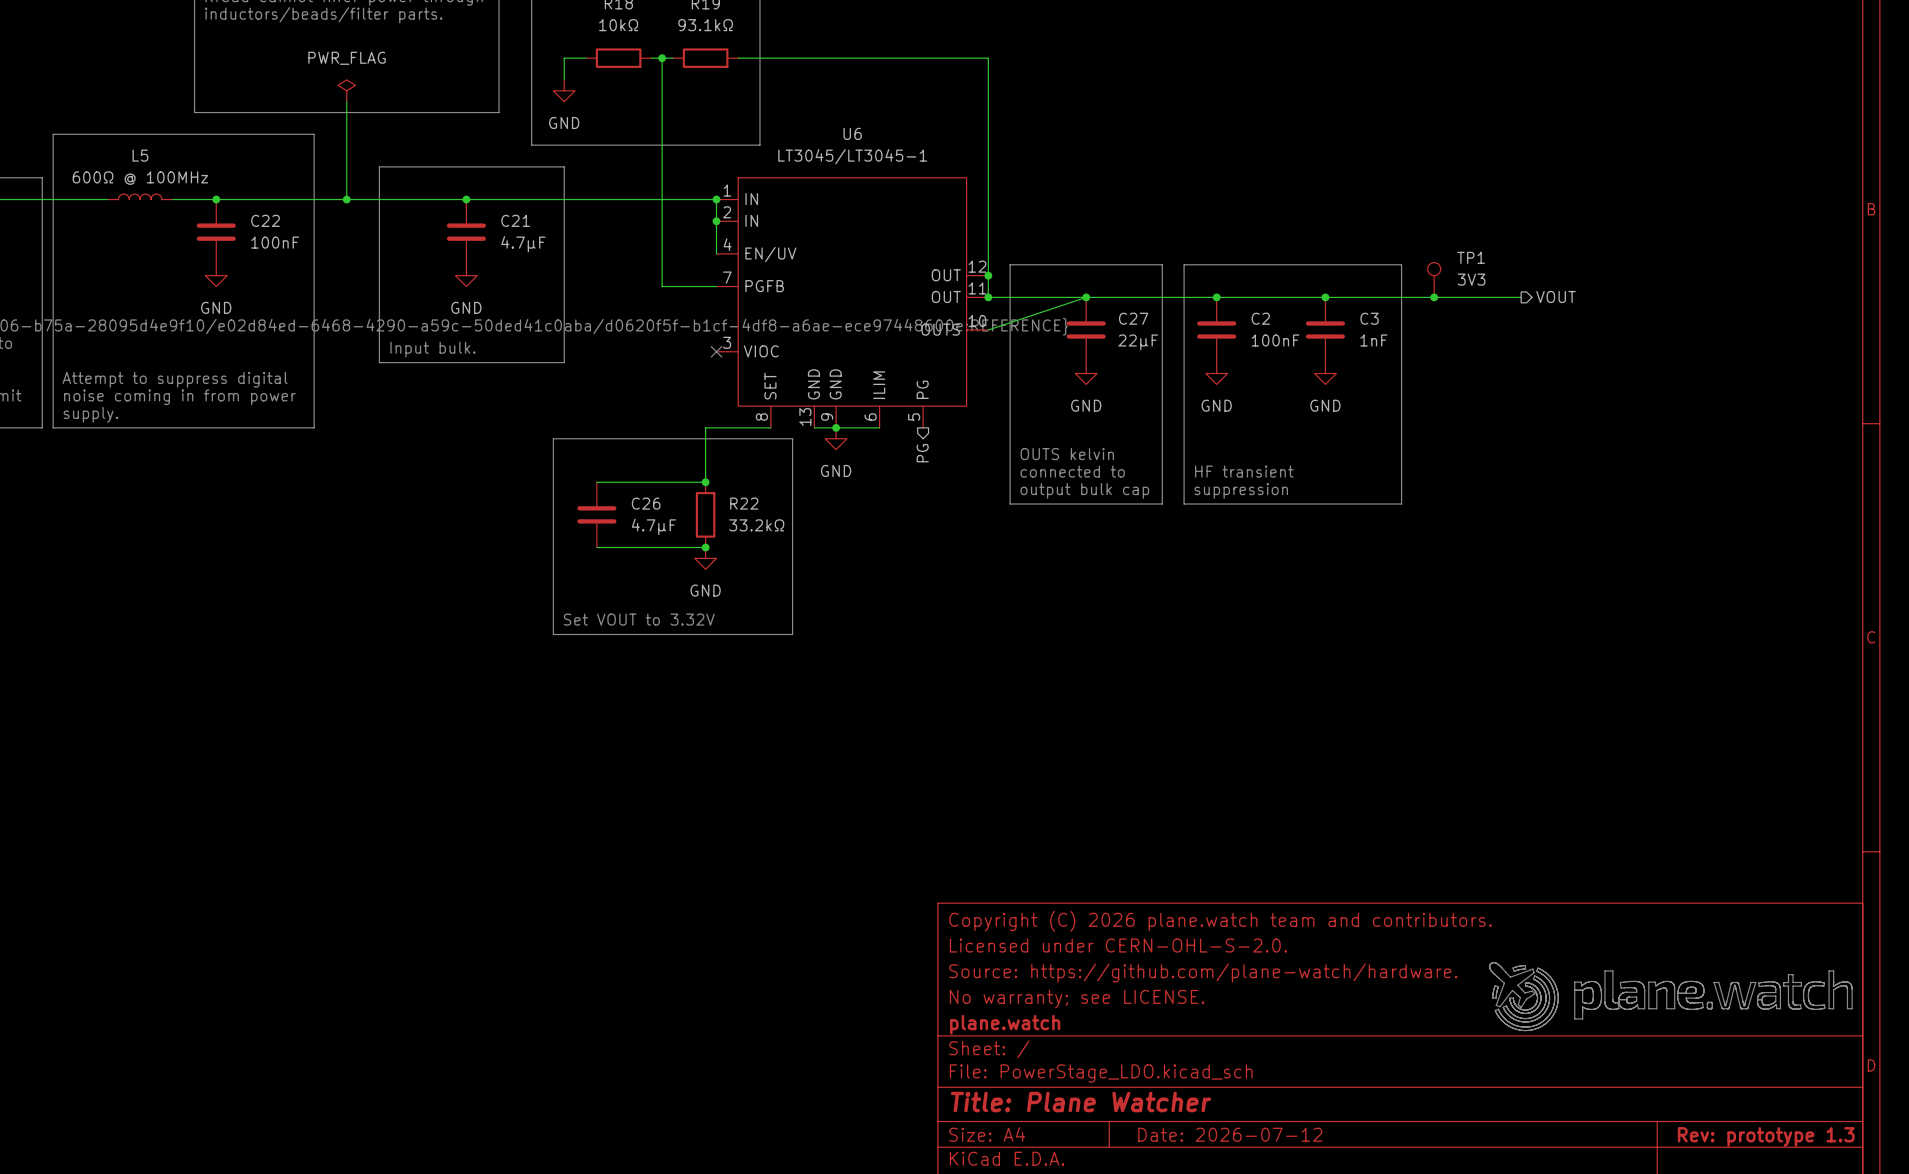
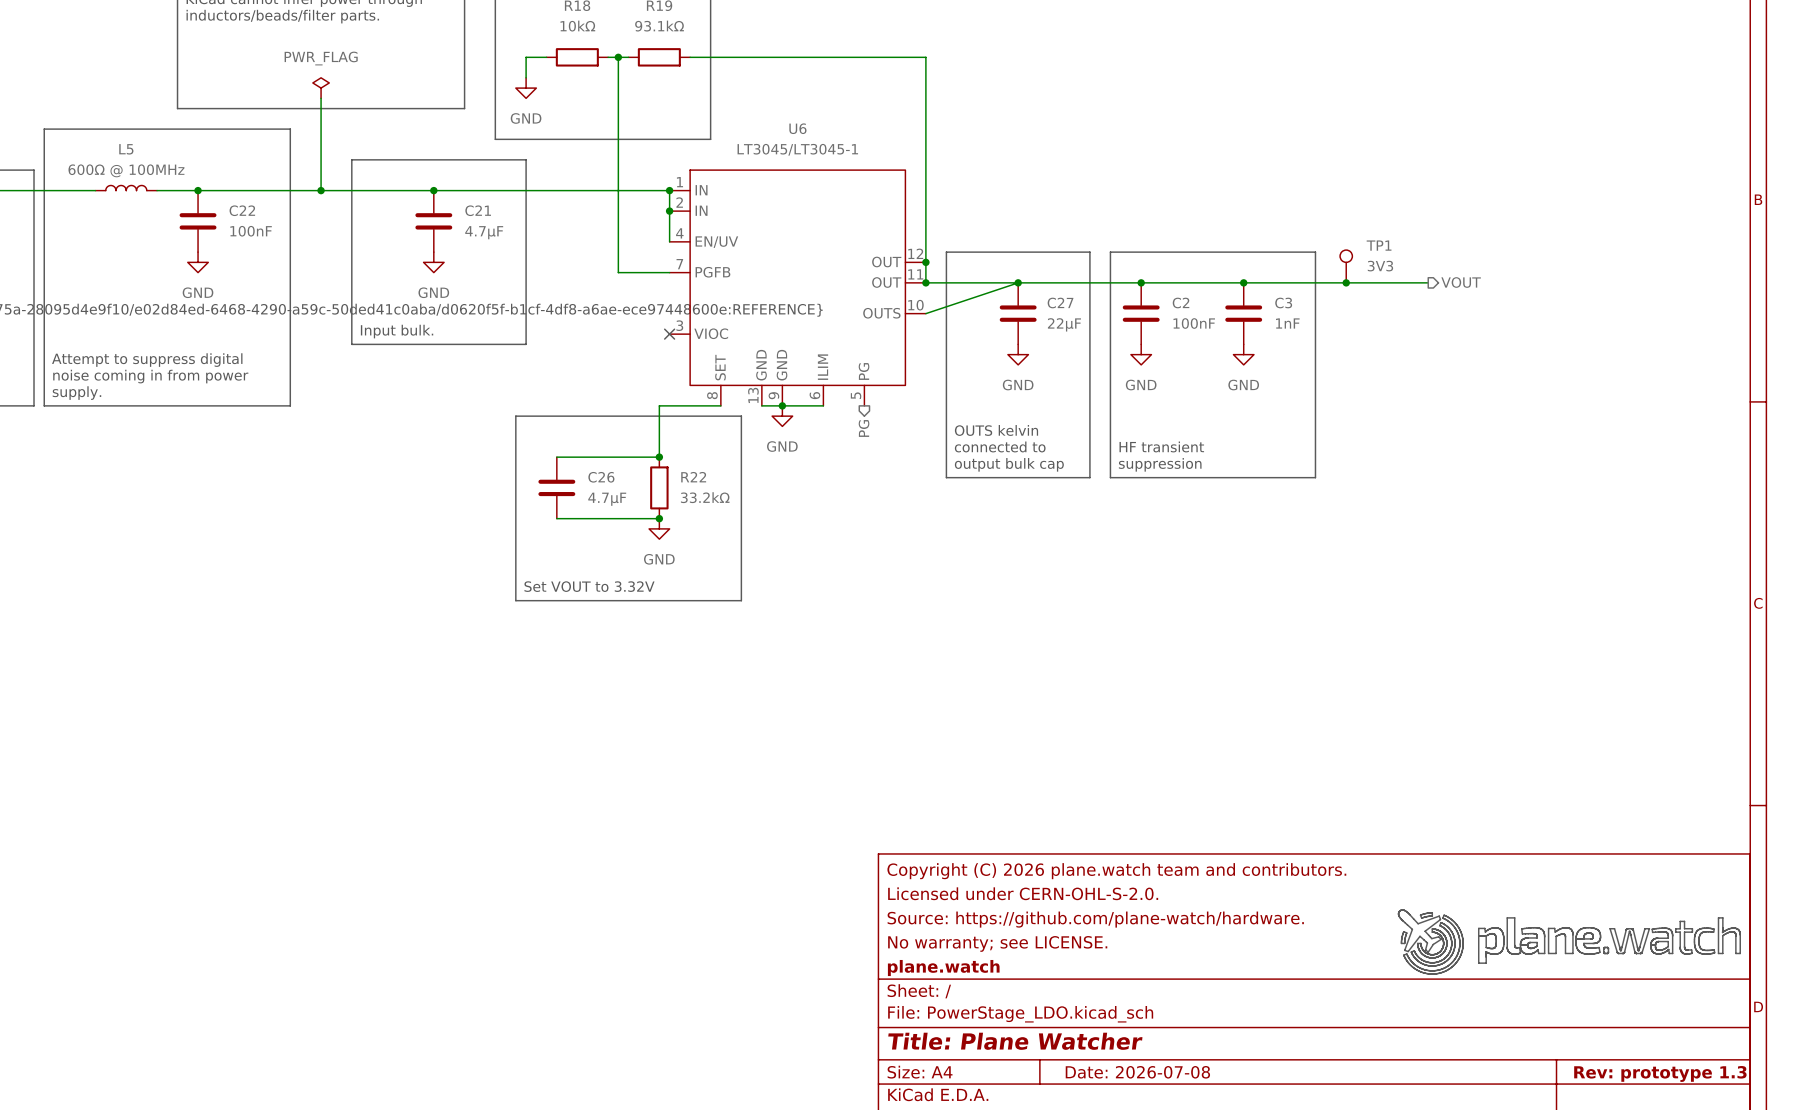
title block: Date: 2026-07-12 (1230, 1134) -> Date: 2026-07-08 (1137, 1072)

